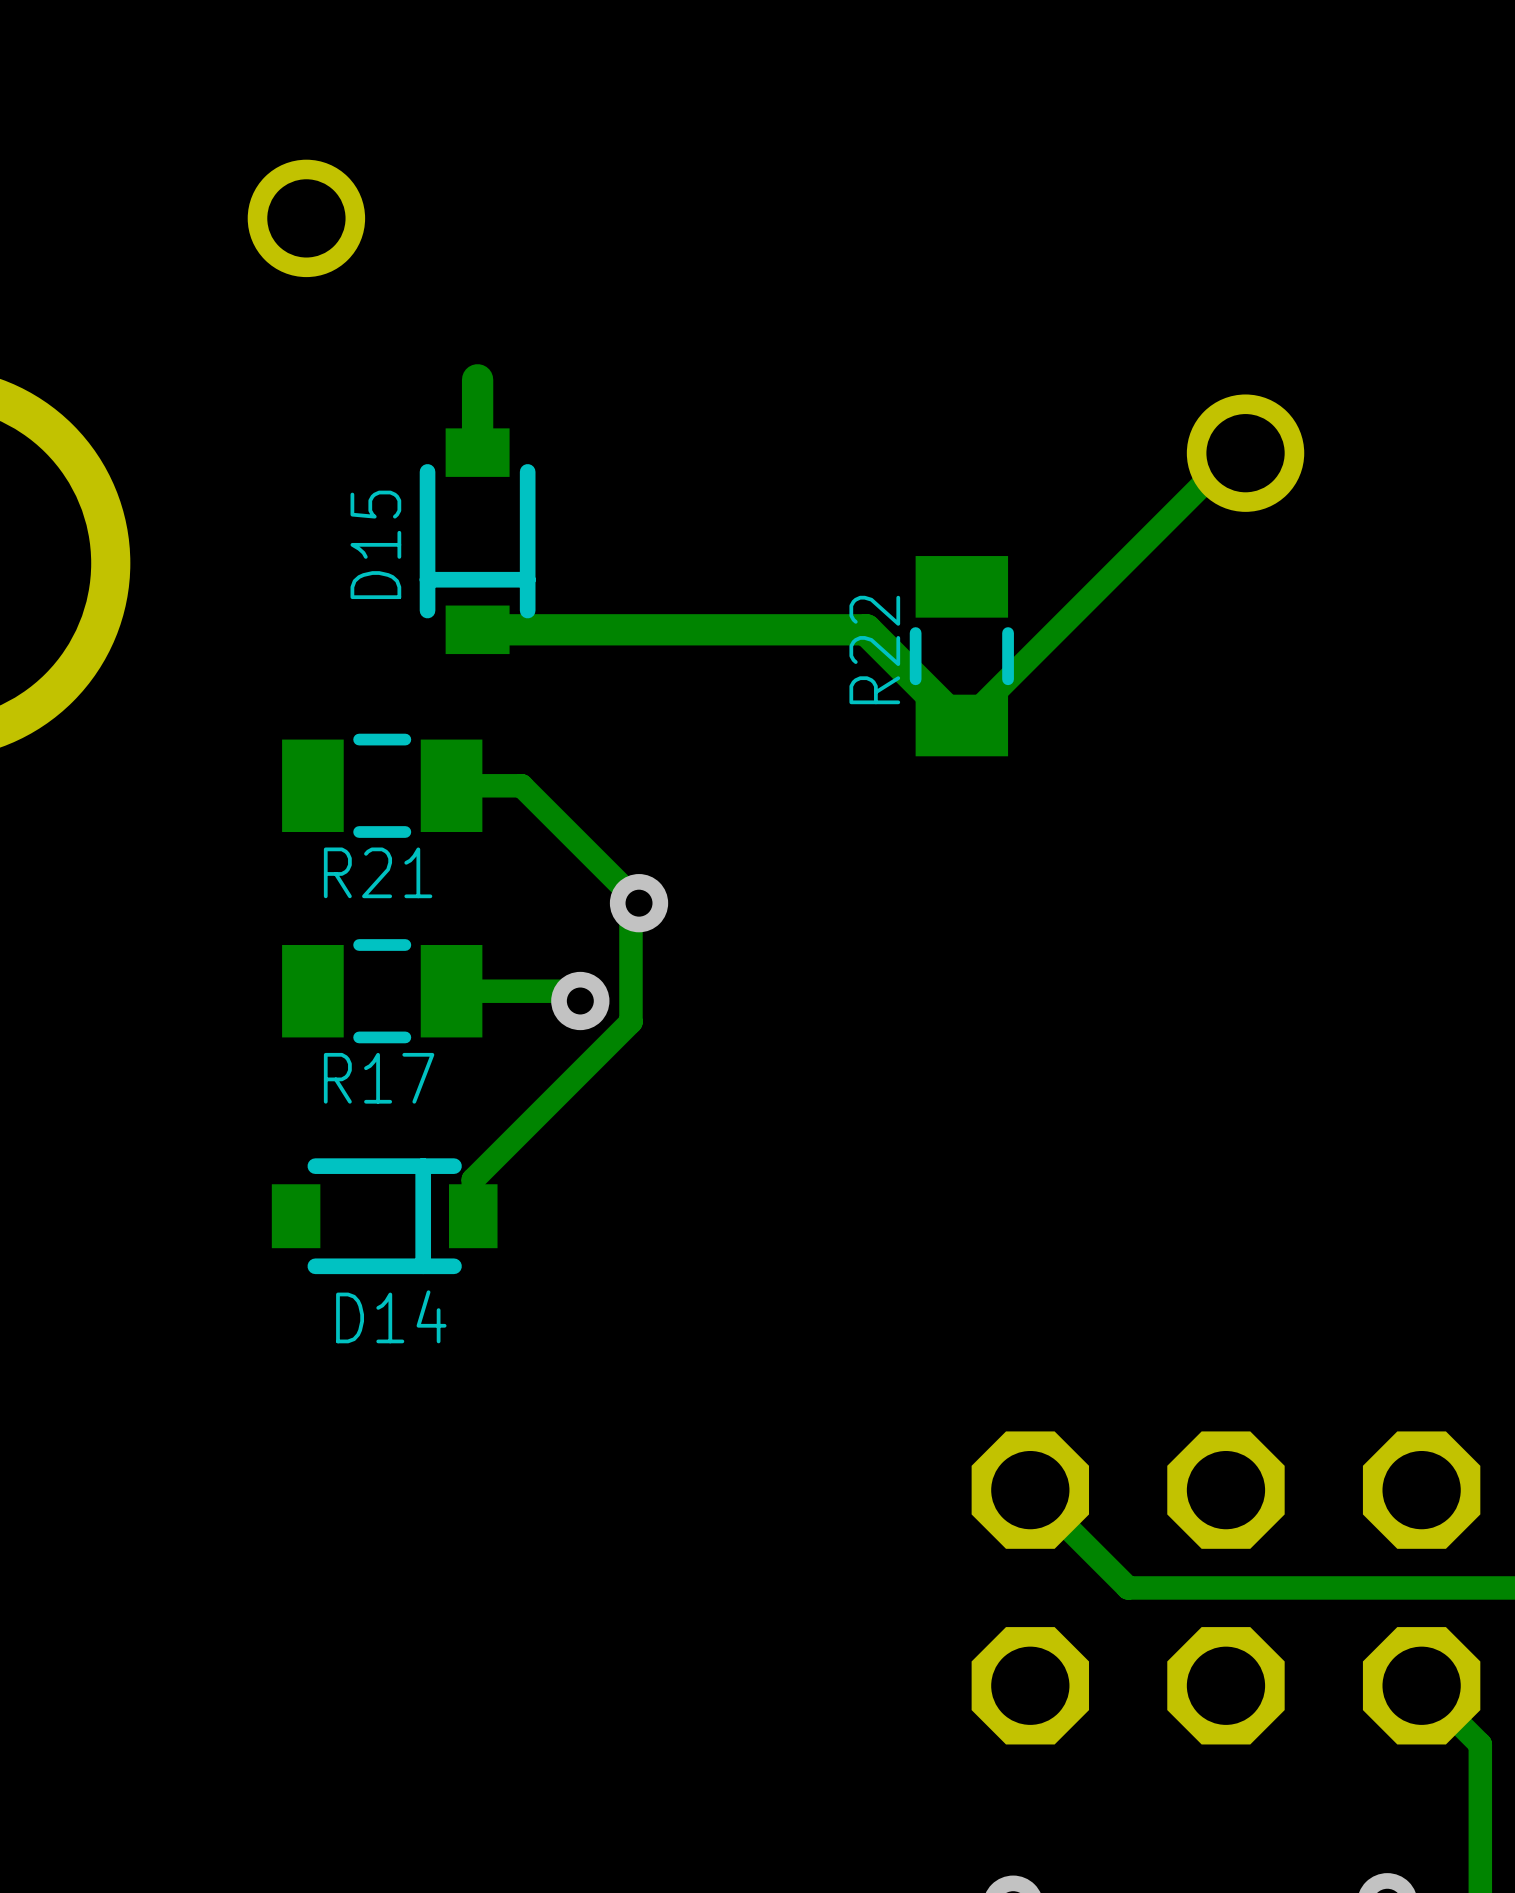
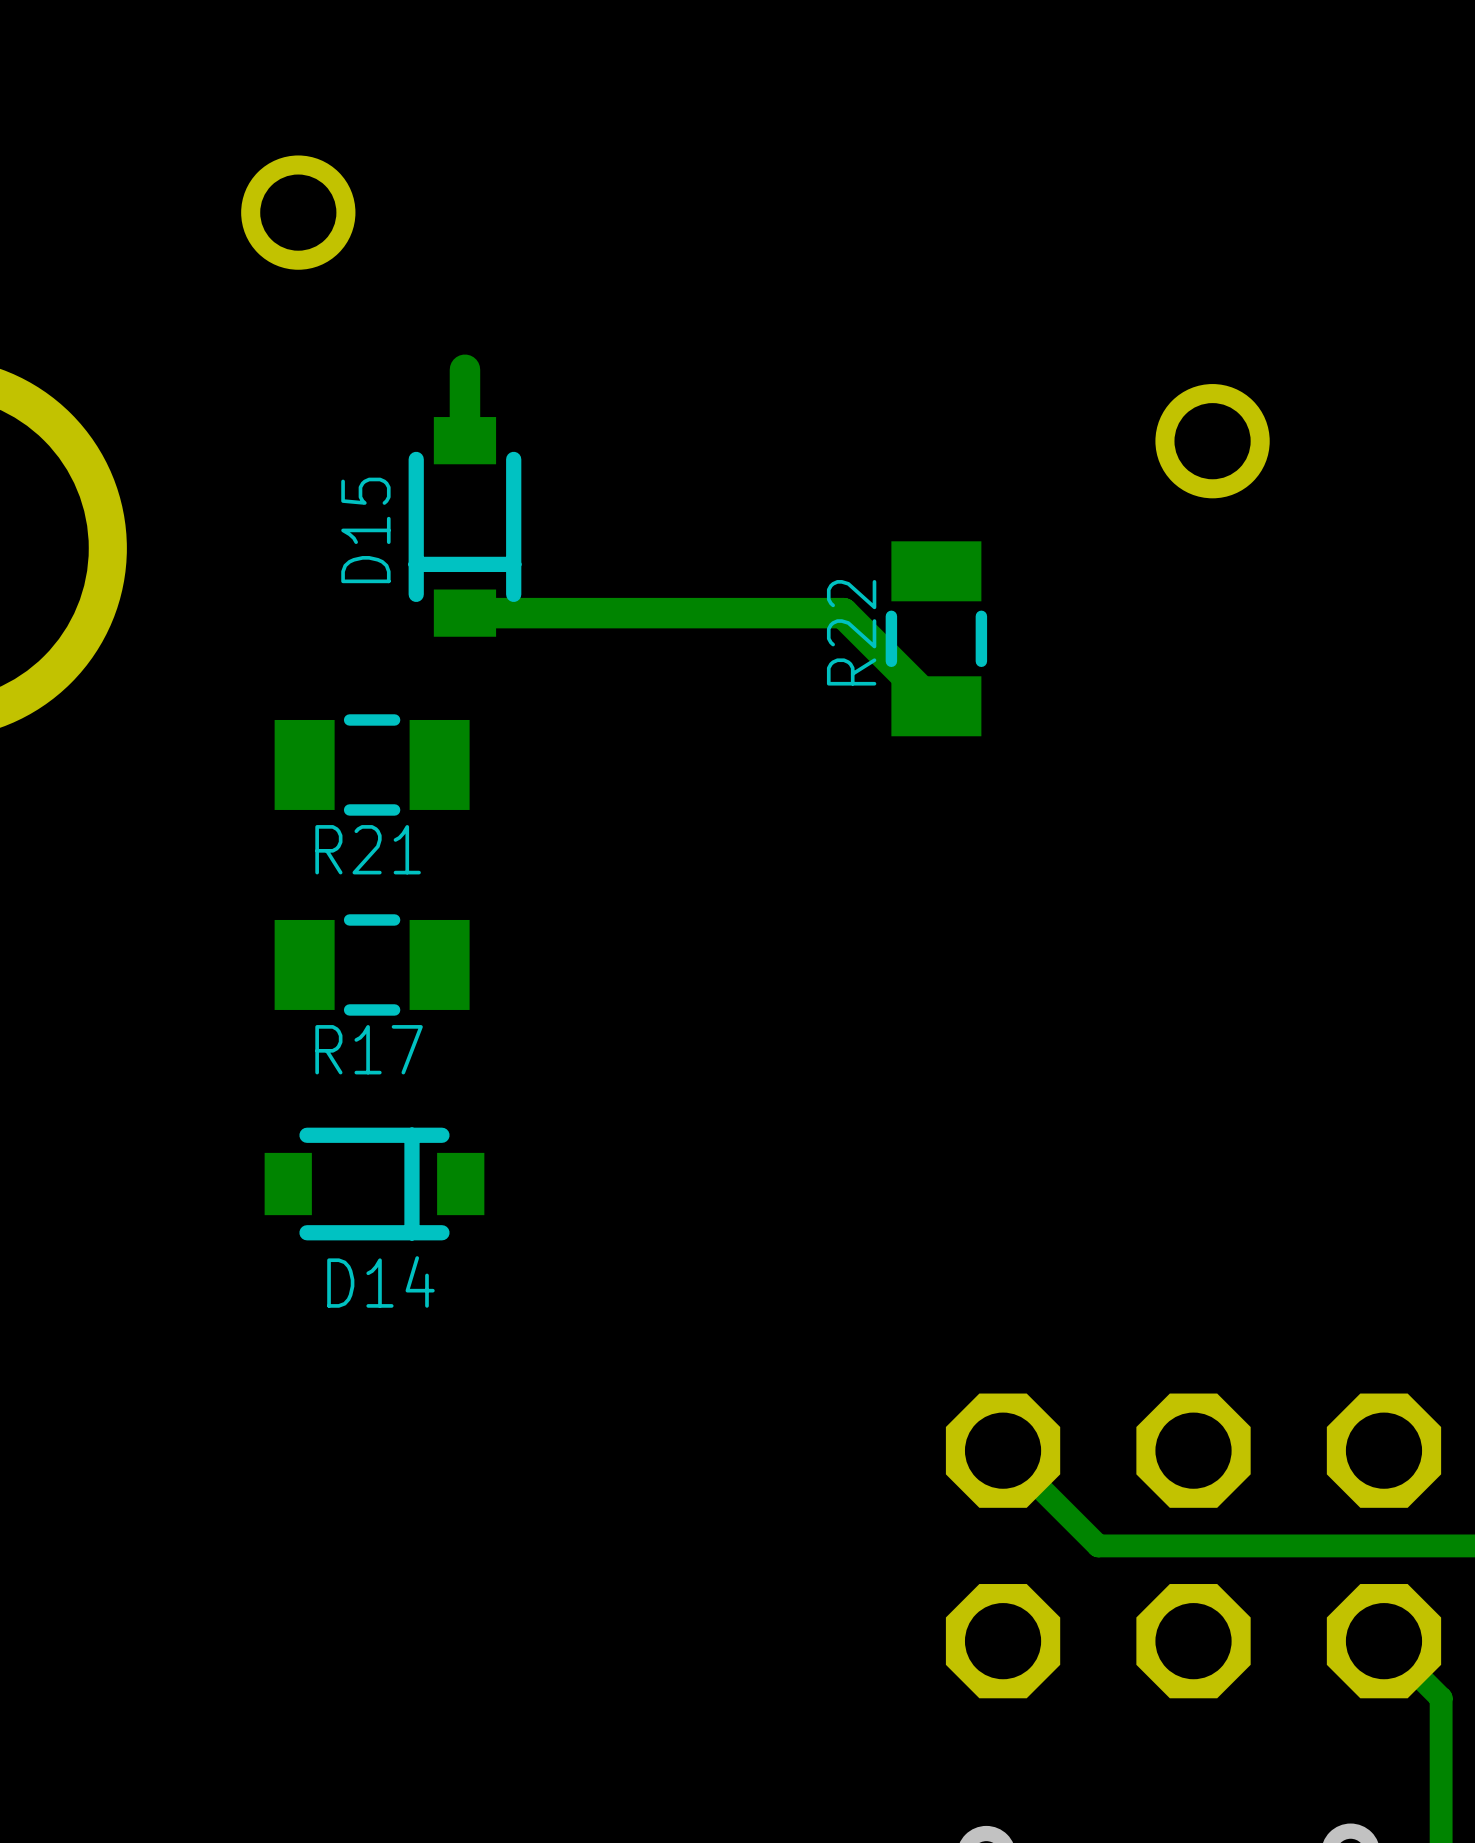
track: (1245, 453) (1234, 453) (961, 725) -> none
track: (451, 785) (521, 785) (639, 903) (630, 911) (630, 1021) (473, 1179) (473, 1216) -> none
via: (639, 903) -> none
track: (451, 991) (570, 991) (580, 1000) -> none
via: (580, 1000) -> none

